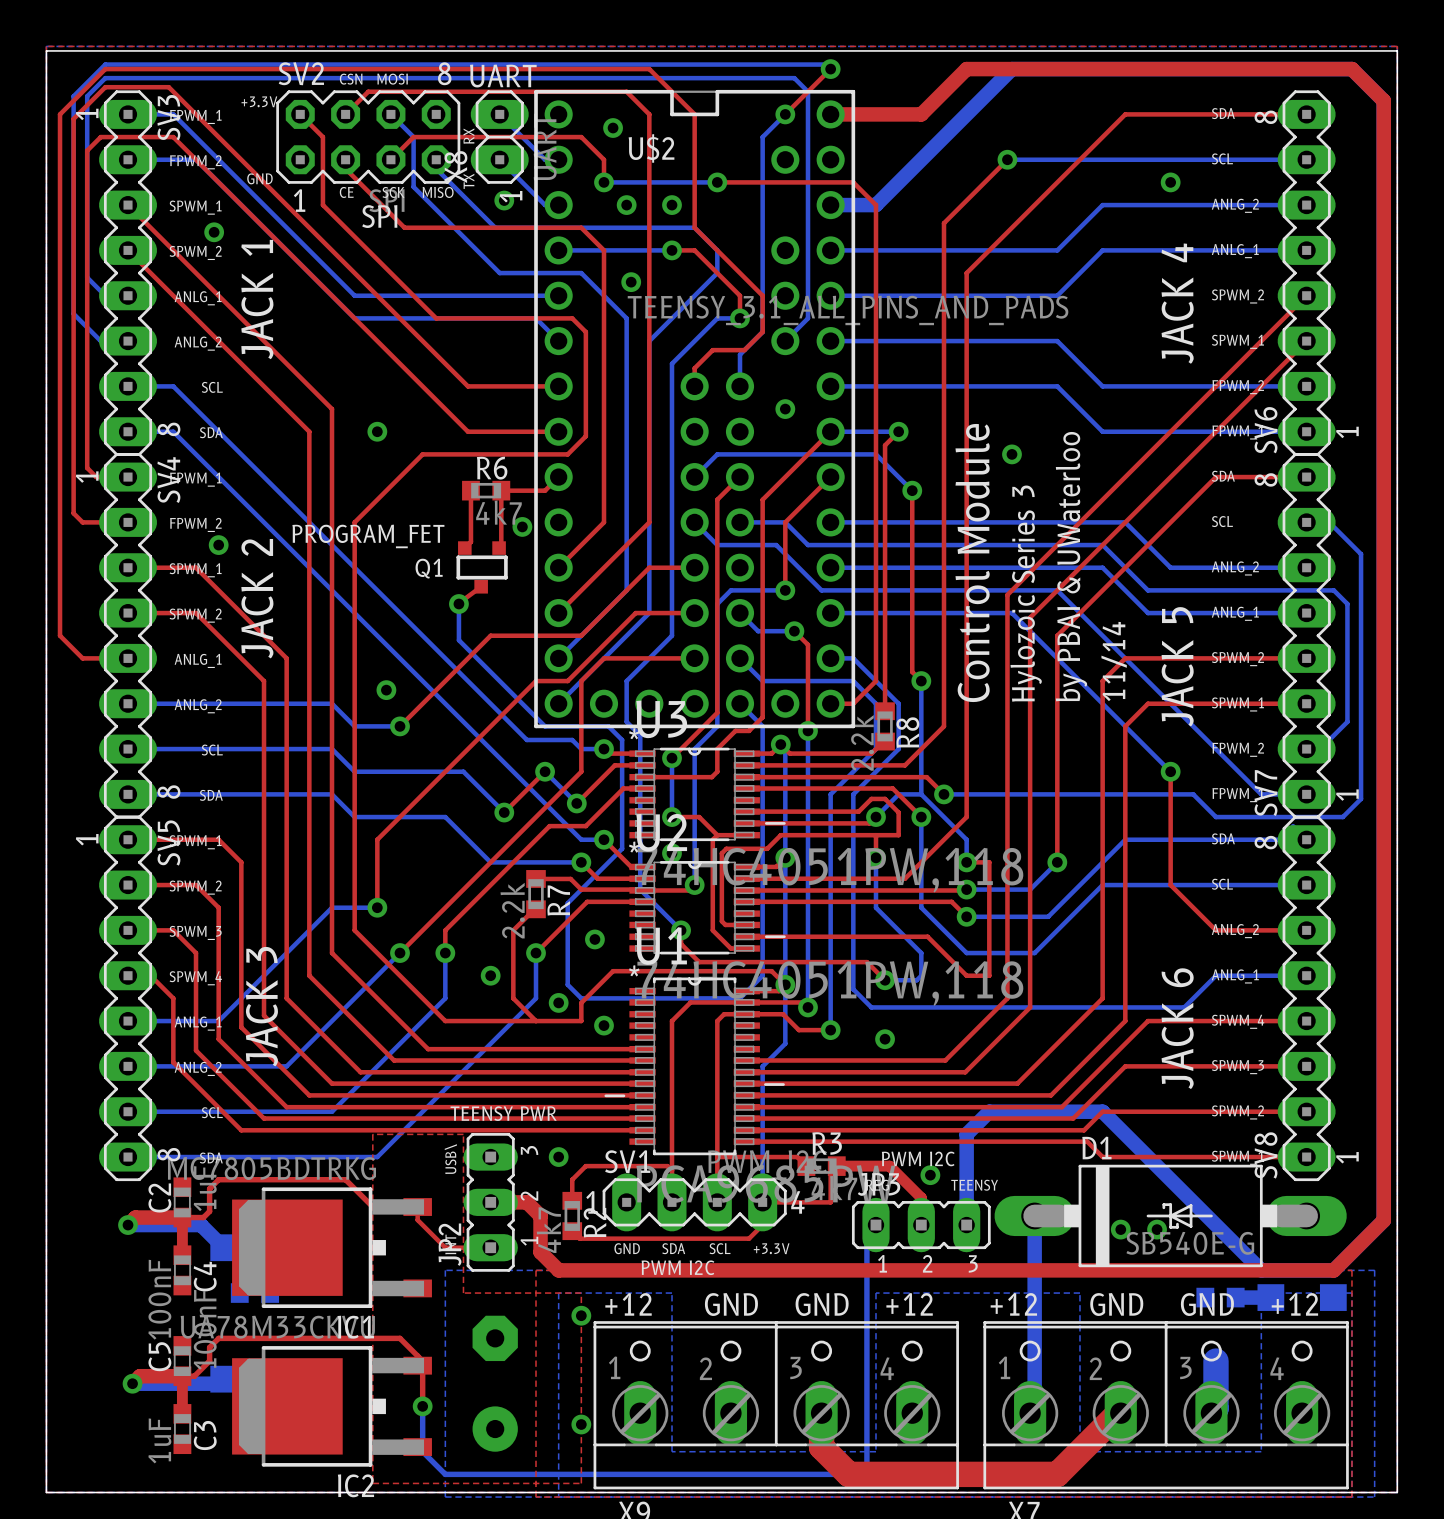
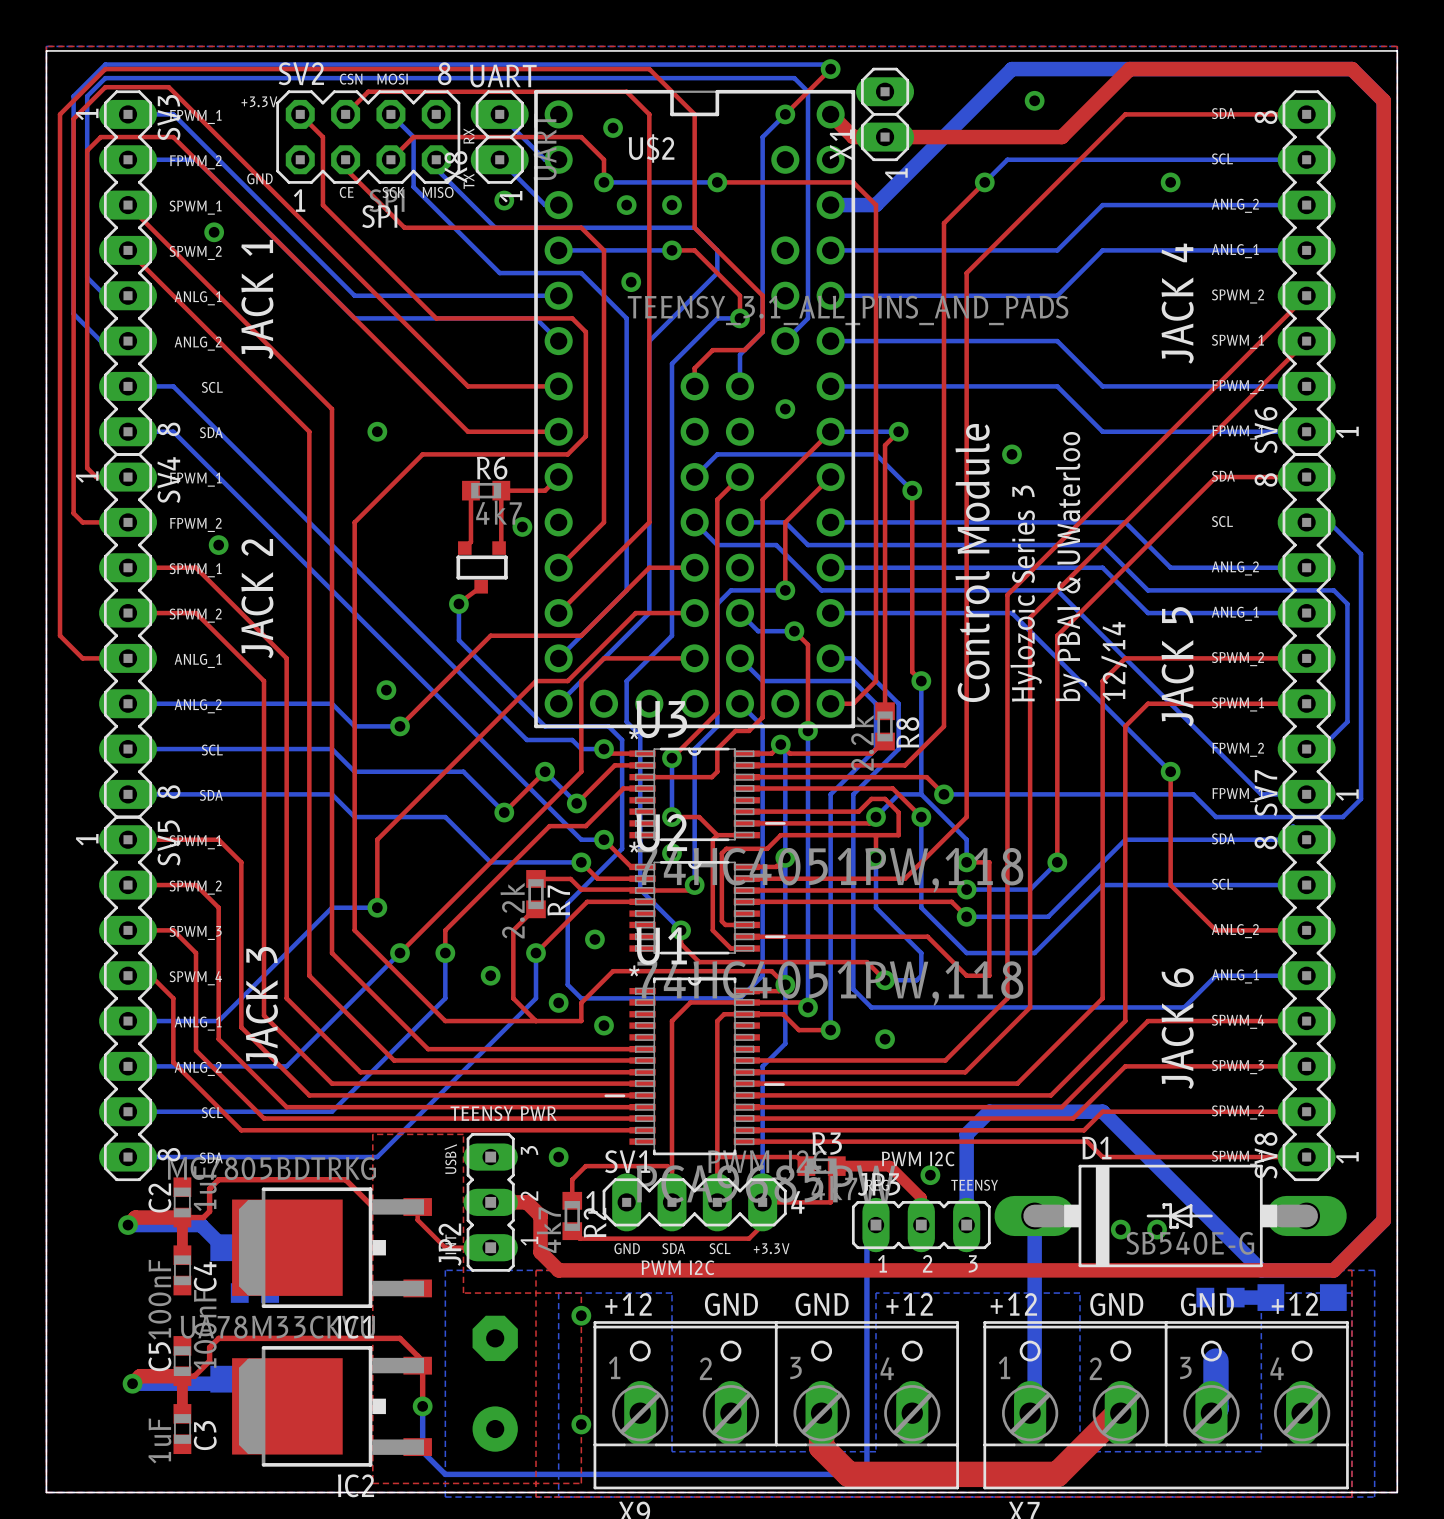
top track: (1129, 69) (966, 69) (921, 114) (830, 114) -> (1129, 69) (1061, 137) (853, 137) (830, 114)
via: none -> (1034, 100)
X1: none -> (885, 114)
bottom track: none -> (1007, 159) (984, 182)
top track: (1007, 159) (984, 182) -> none
via position: (1007, 159) -> (984, 182)
Q1 value: PROGRAM_FET (368, 536) -> none
Q1 name: Q1 (429, 568) -> none
text: 11/14 (1114, 661) -> 12/14 (1114, 661)

